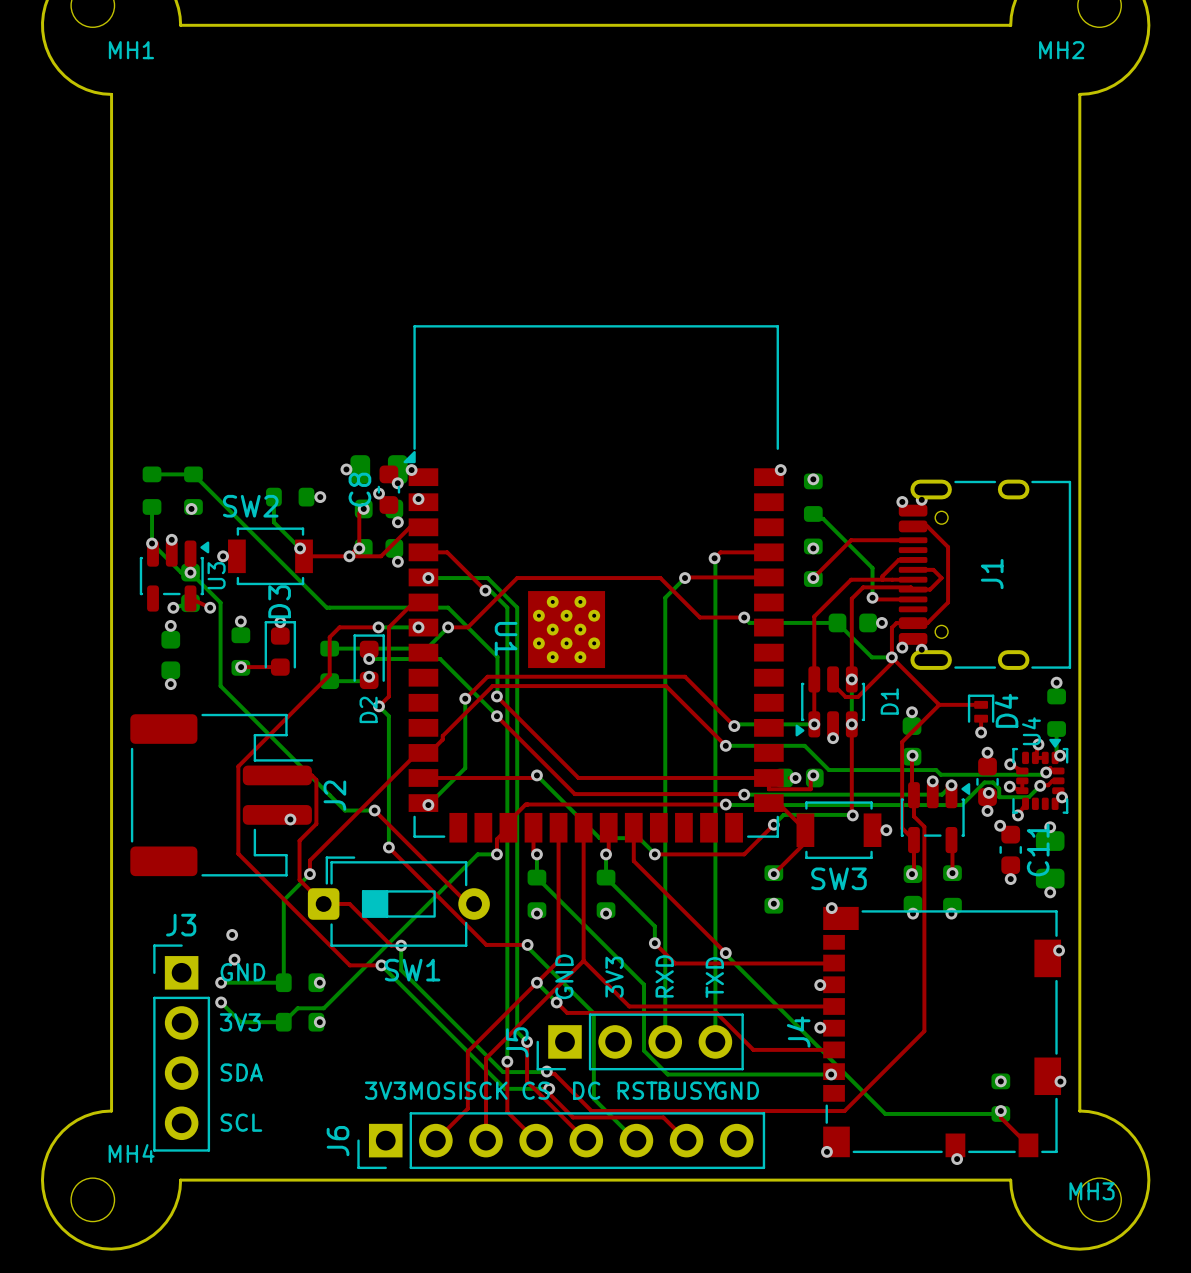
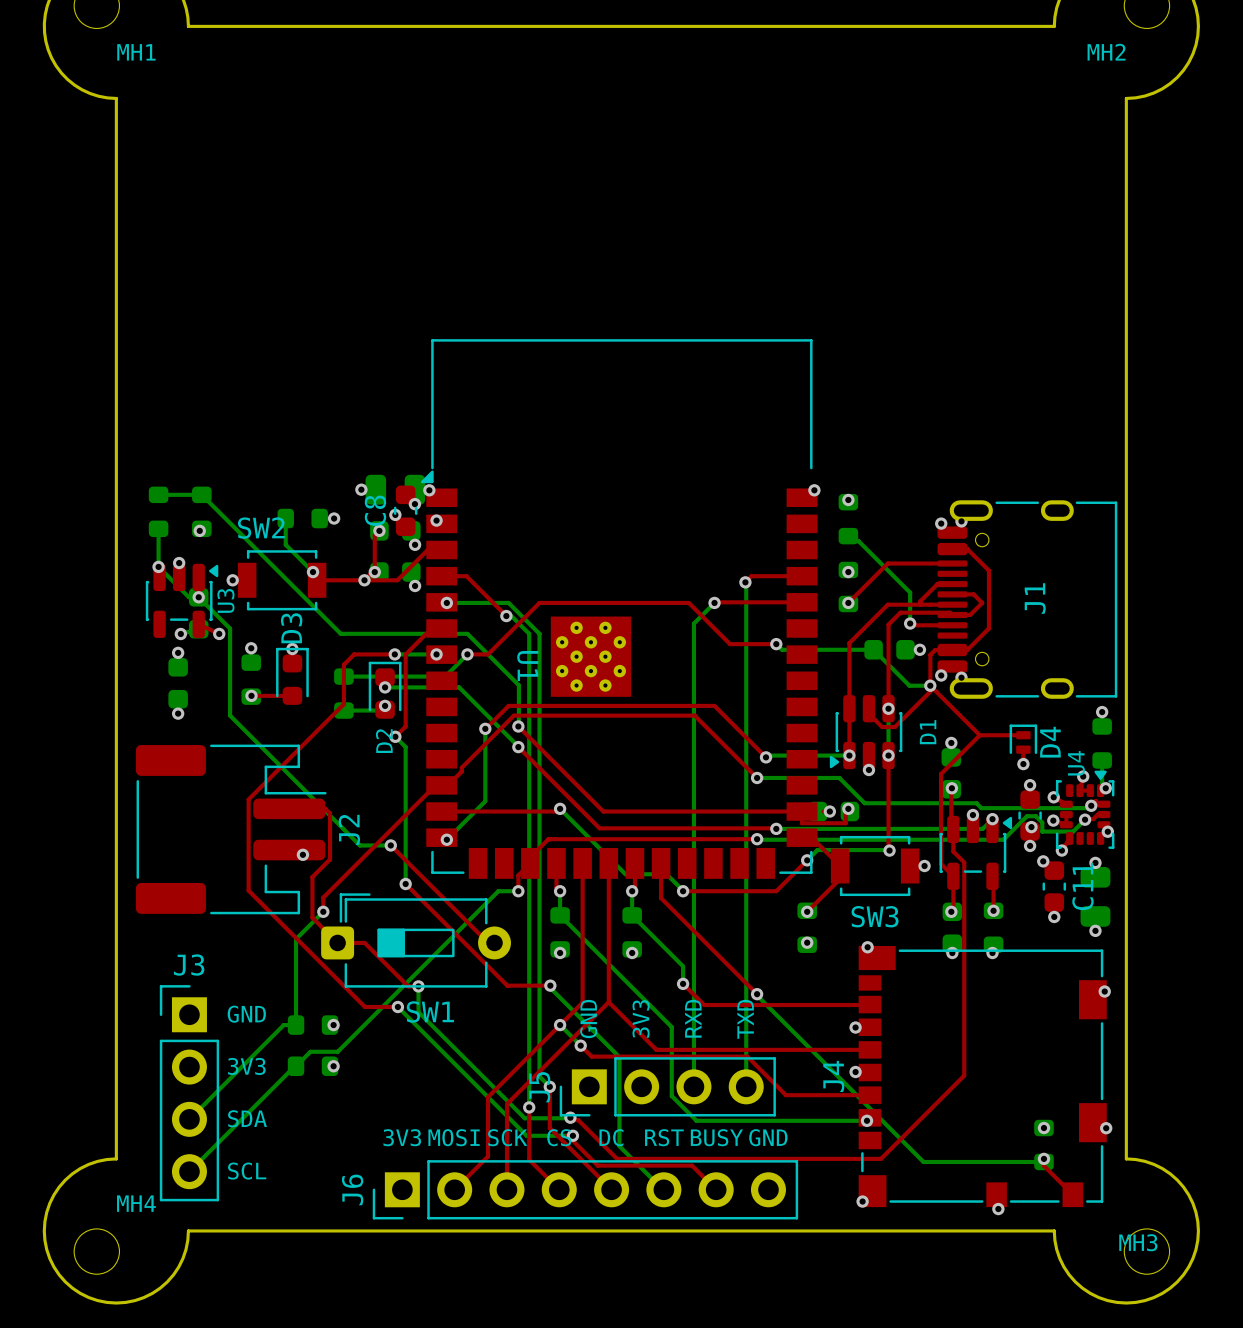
via: (232, 934) -> none
via: (234, 959) -> none
bottom track: (221, 982) (272, 982) -> (189, 1119) (283, 1025)
via: (221, 982) -> none
bottom track: (221, 1002) (240, 1022) (282, 1022) -> (189, 1171) (294, 1066)
via: (221, 1002) -> none

